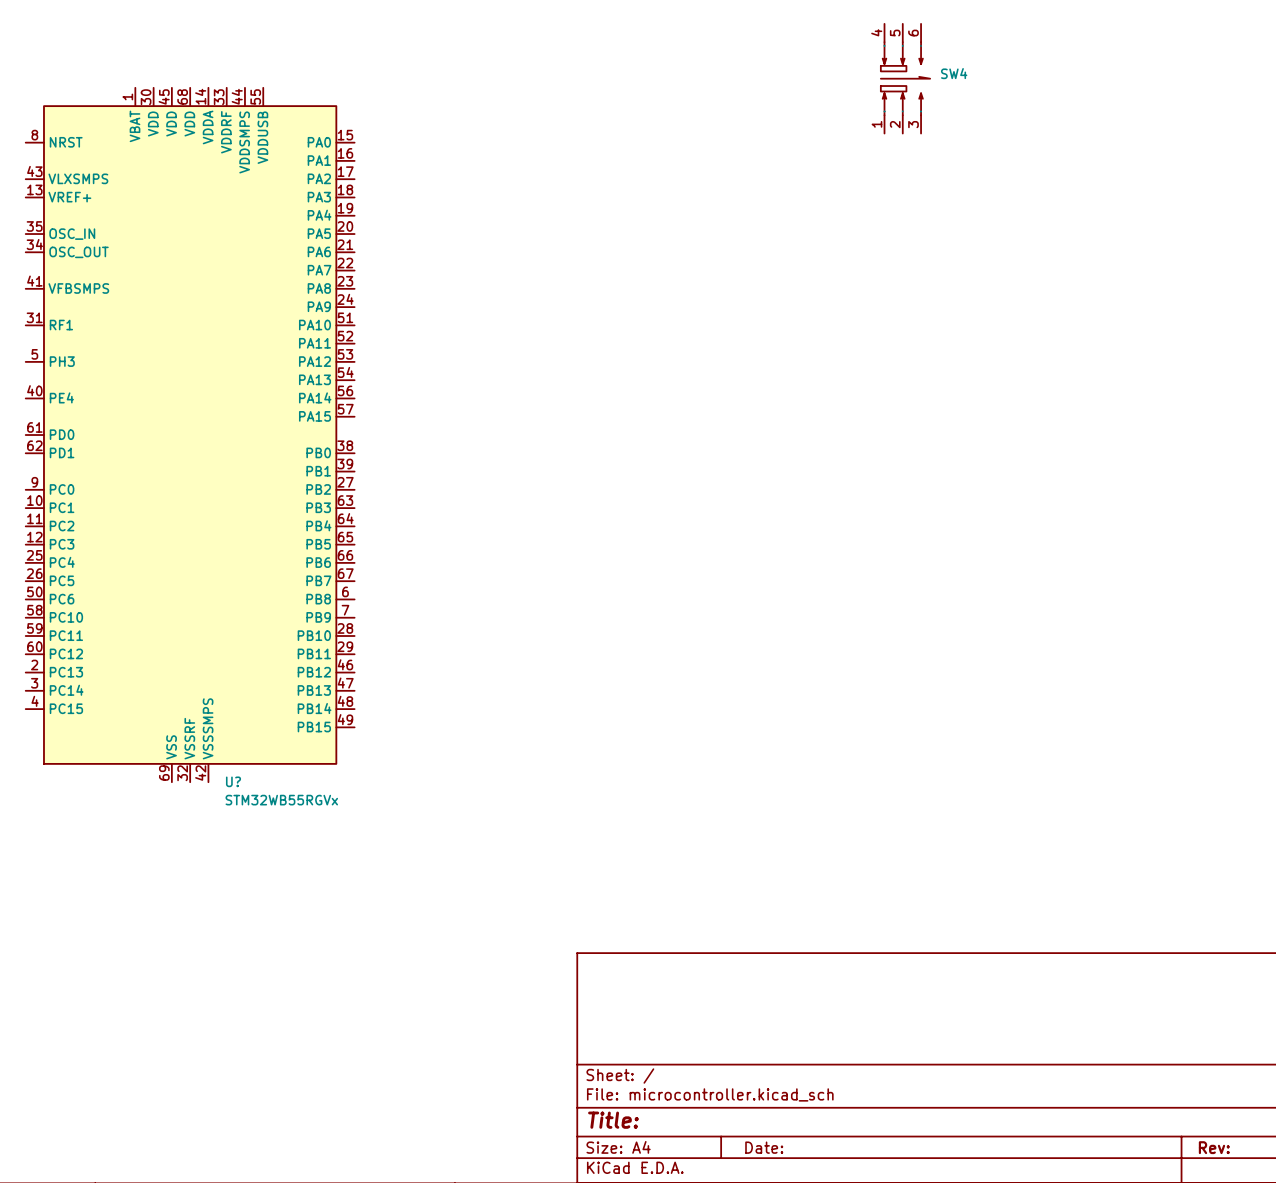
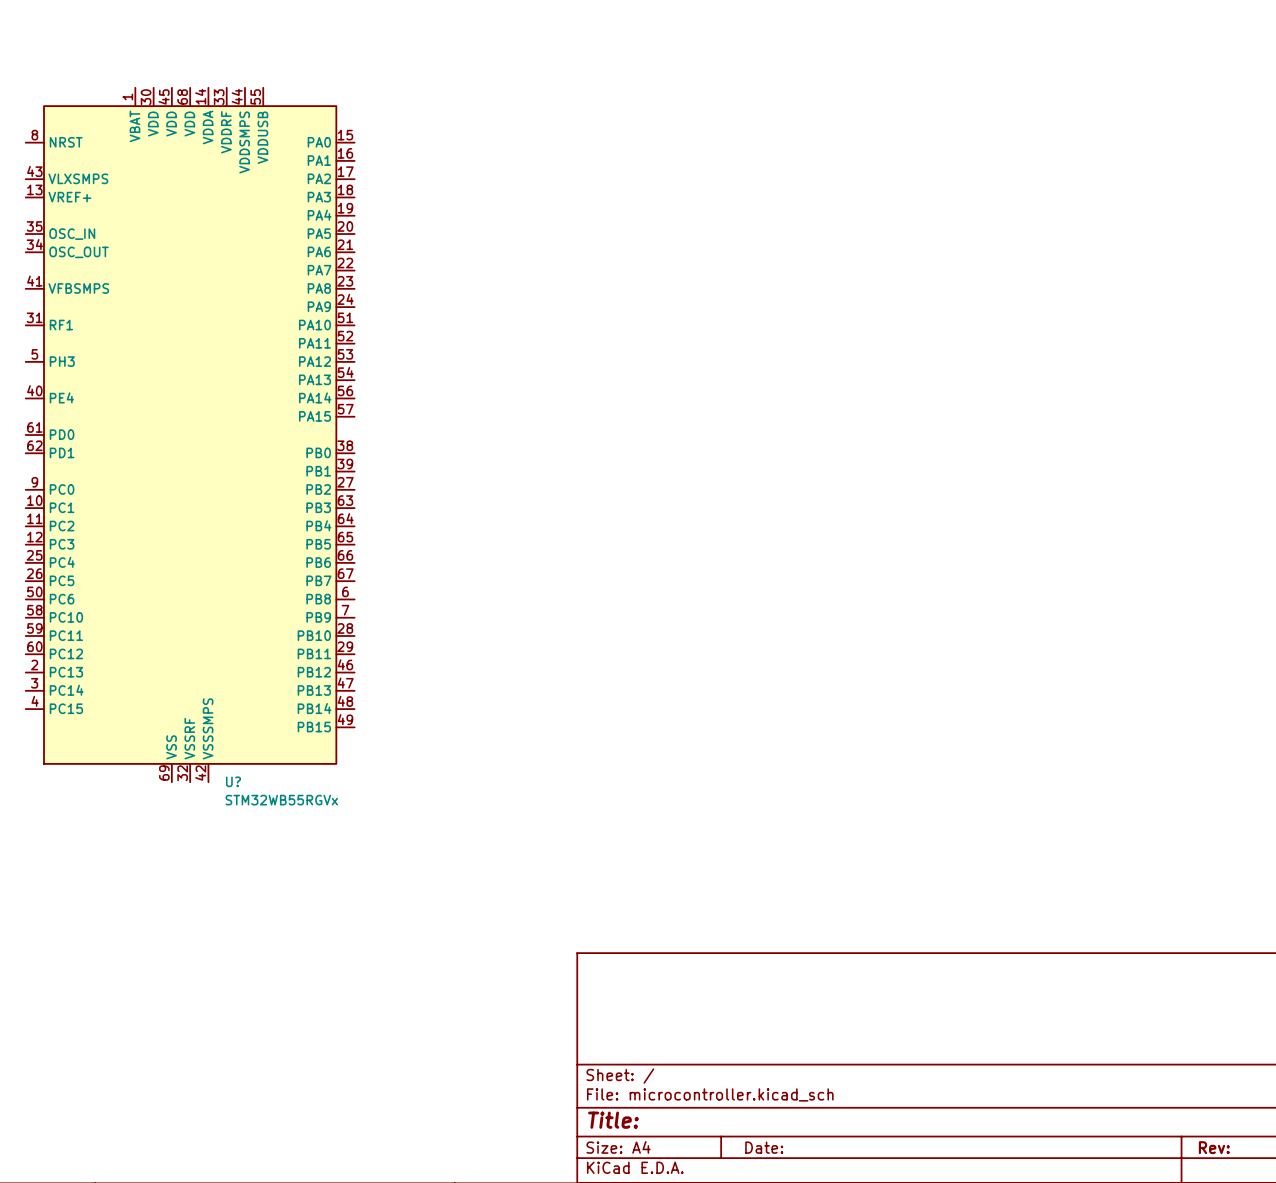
SW4: (905, 78) -> none

